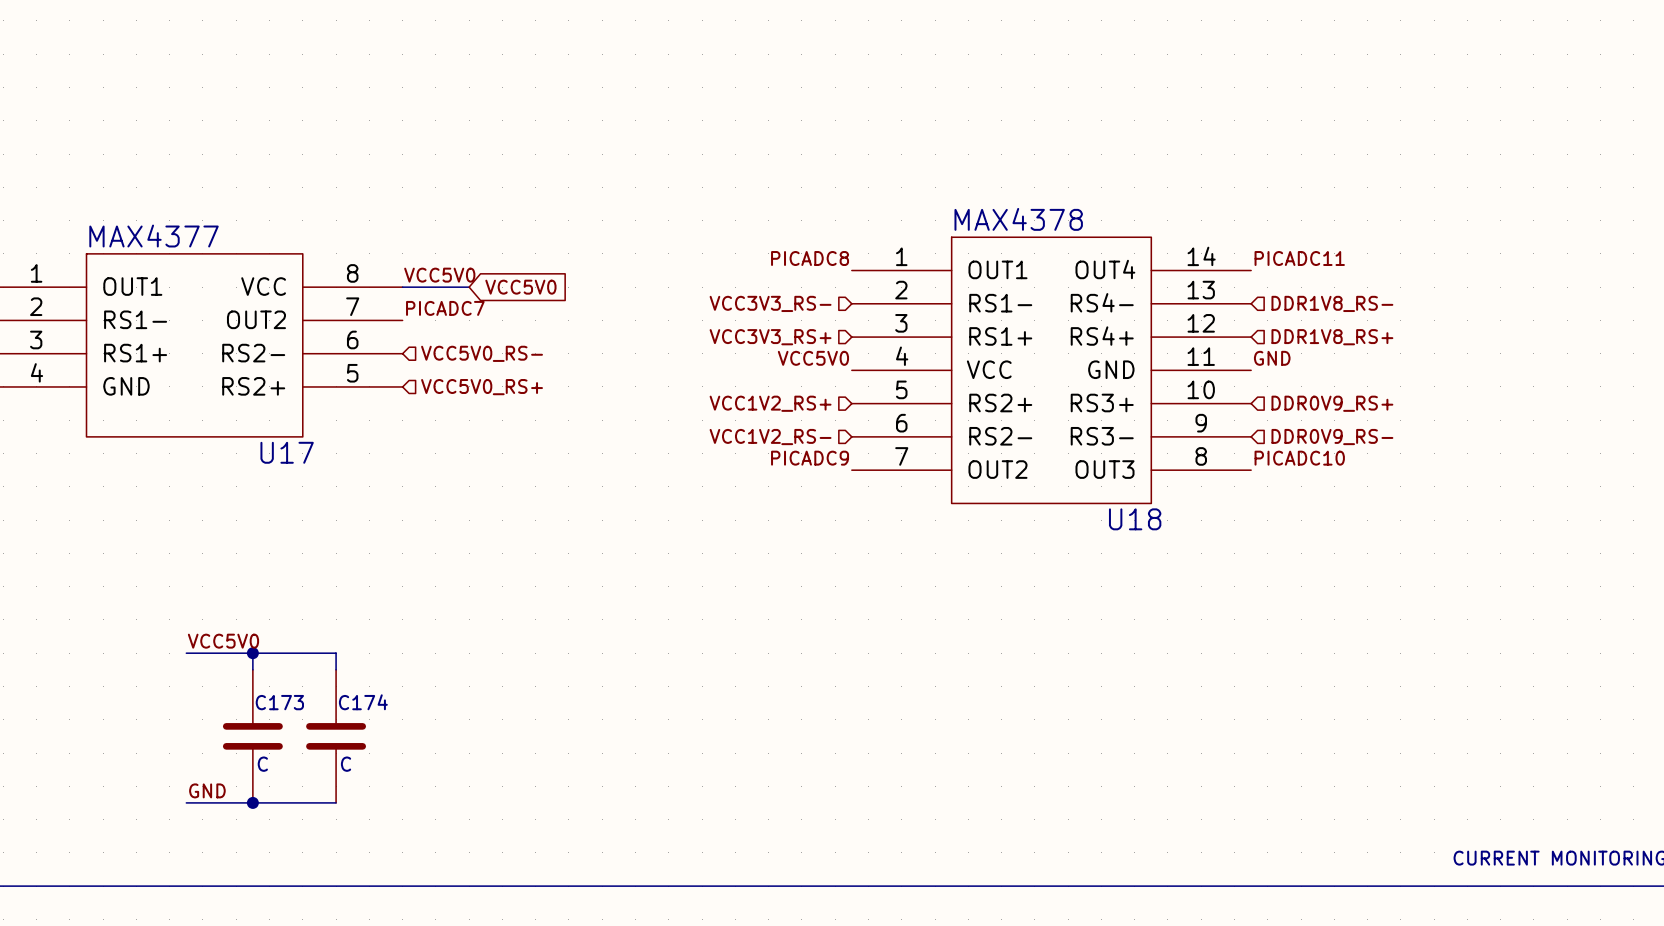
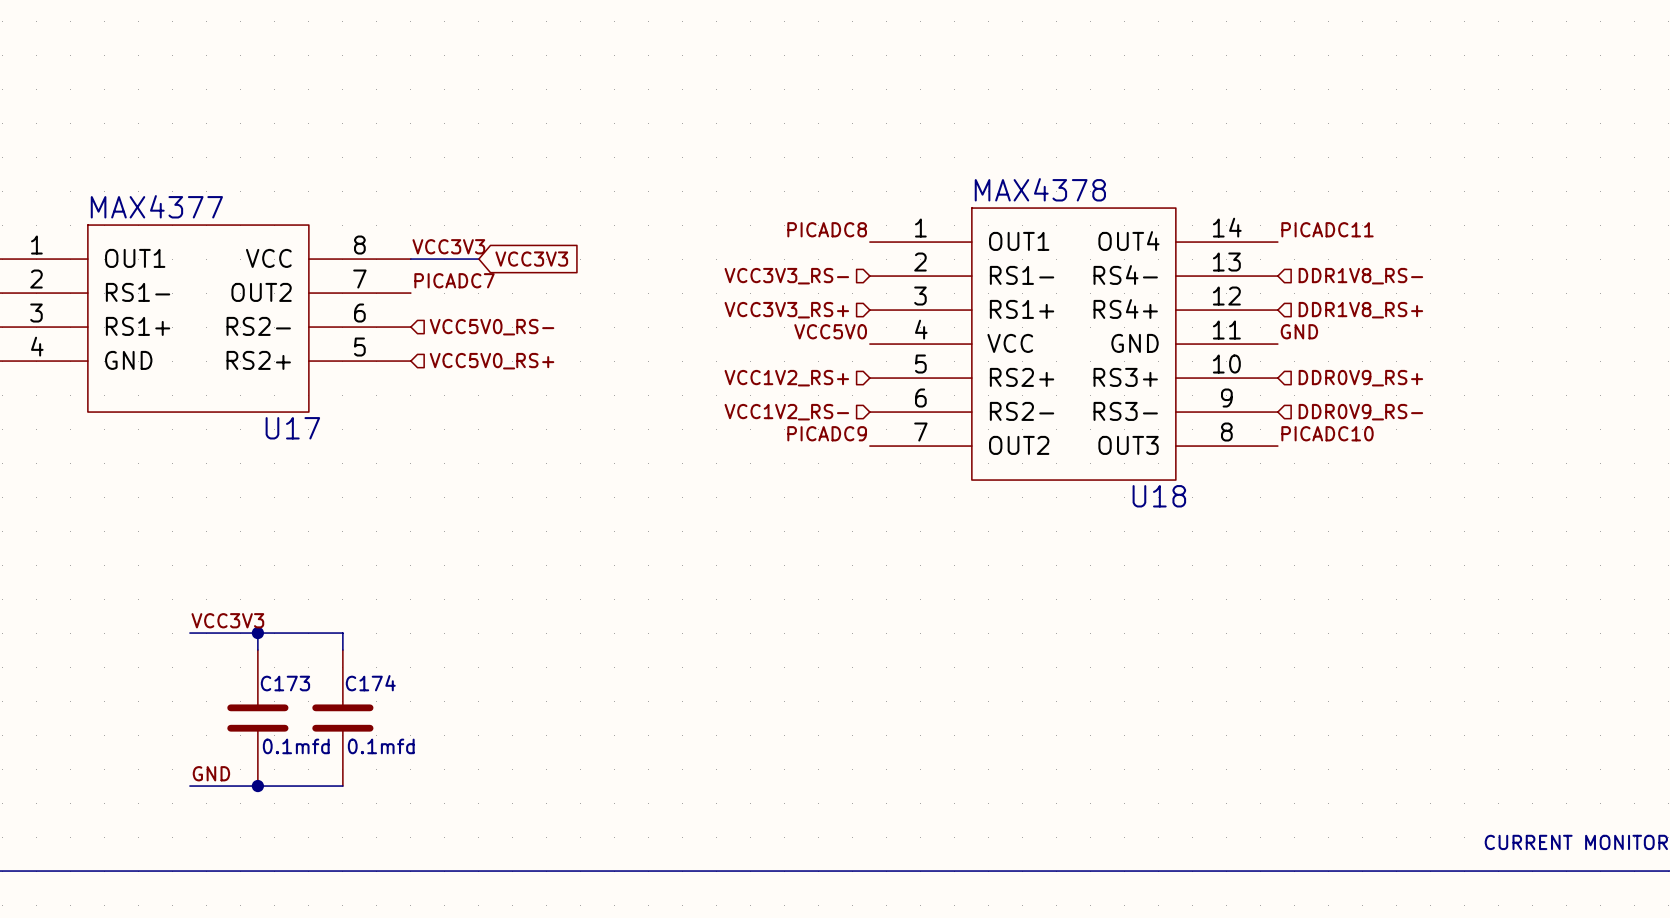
label: VCC5V0 (439, 275) -> VCC3V3 (448, 246)
global label: VCC5V0 (520, 287) -> VCC3V3 (531, 259)
label: VCC5V0 (223, 641) -> VCC3V3 (227, 620)
C173 value: C (262, 764) -> 0.1mfd (296, 746)
C174 value: C (346, 764) -> 0.1mfd (381, 746)

